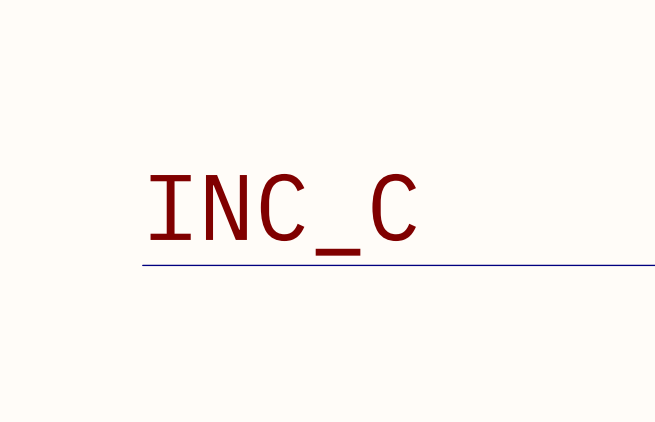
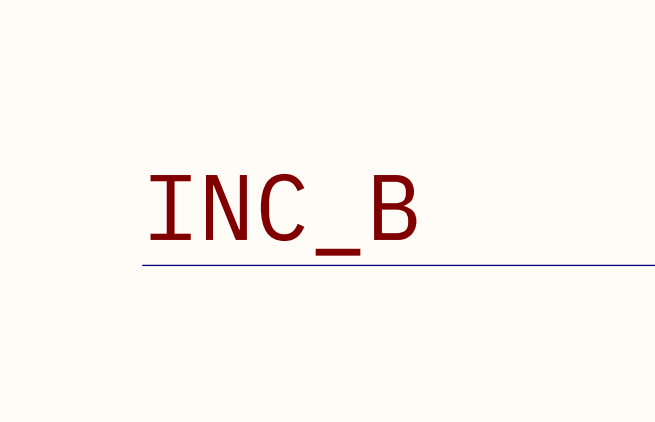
label: INC_C (283, 214) -> INC_B (283, 214)

